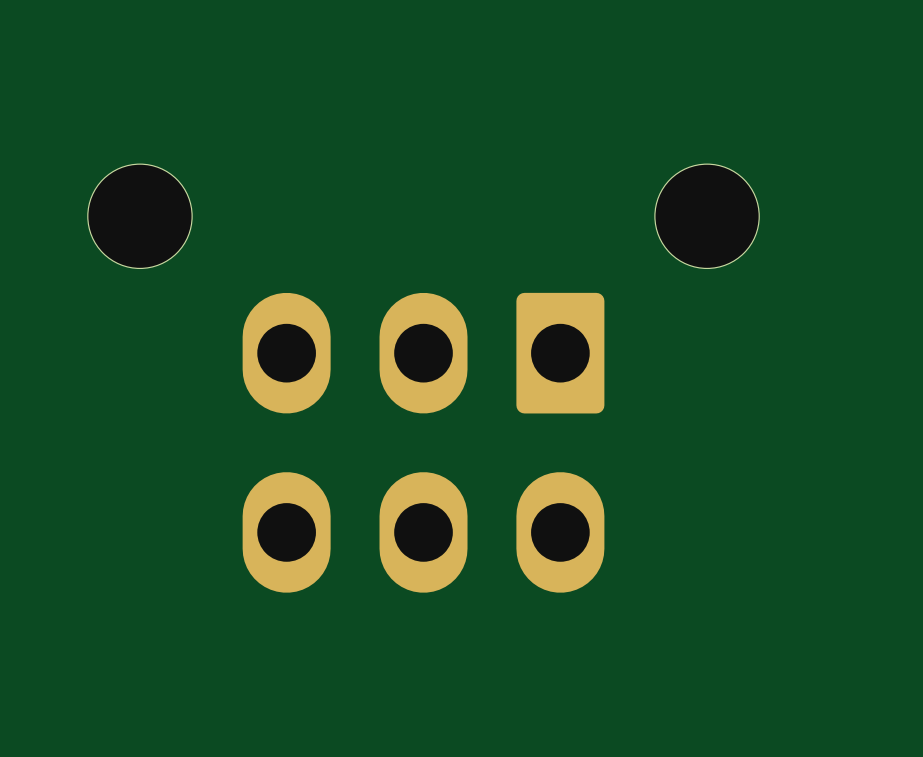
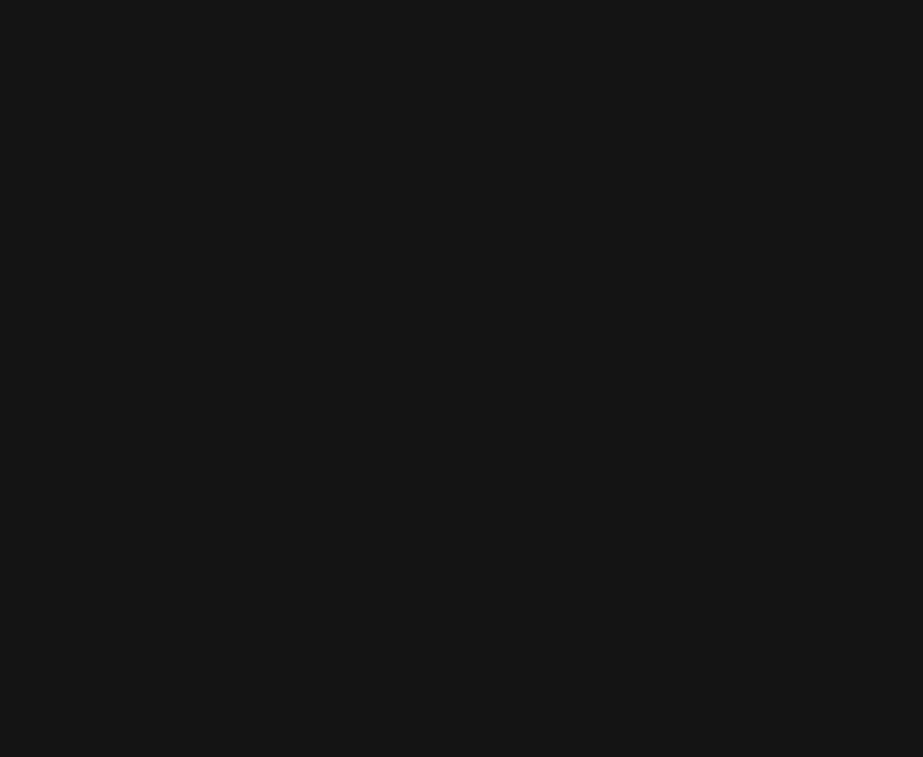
part: (423, 378) -> none

